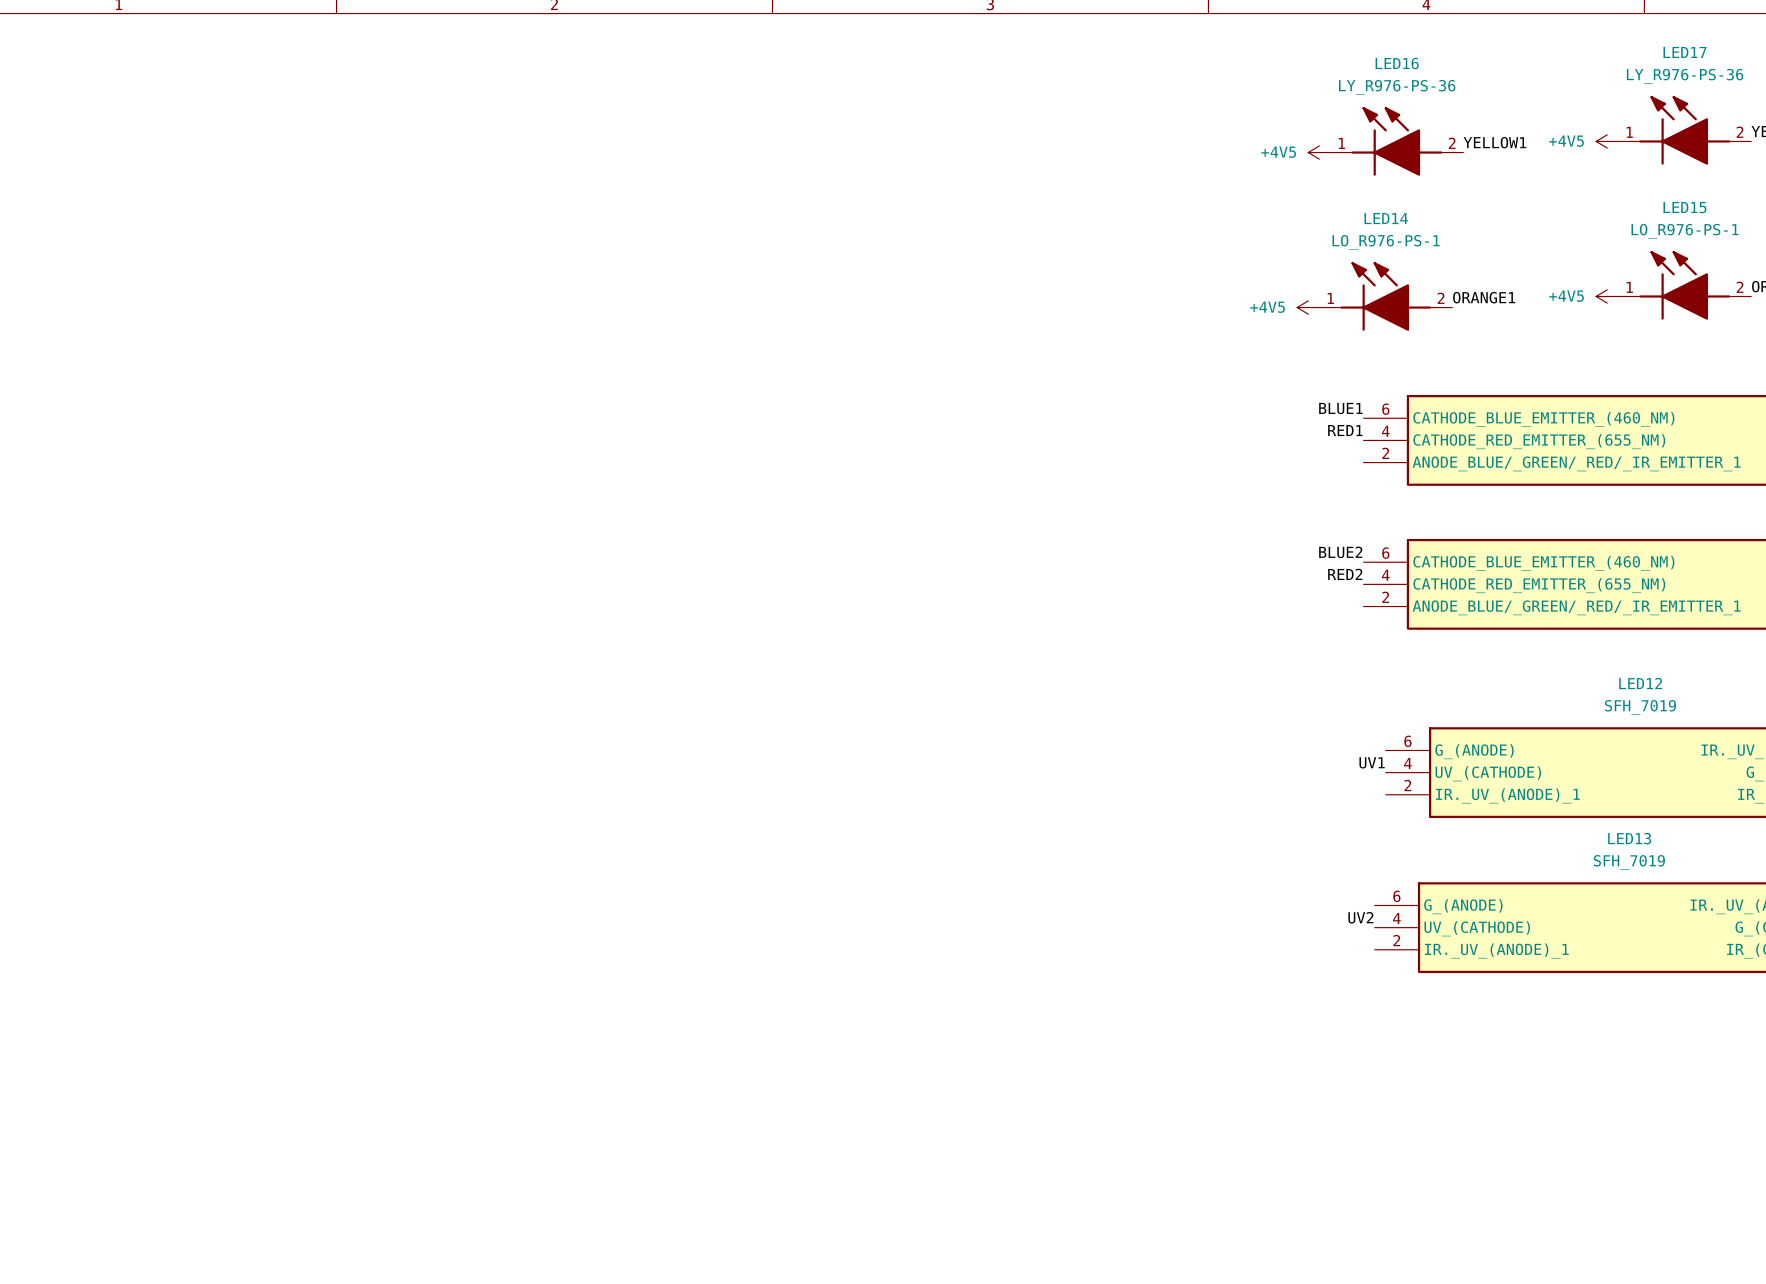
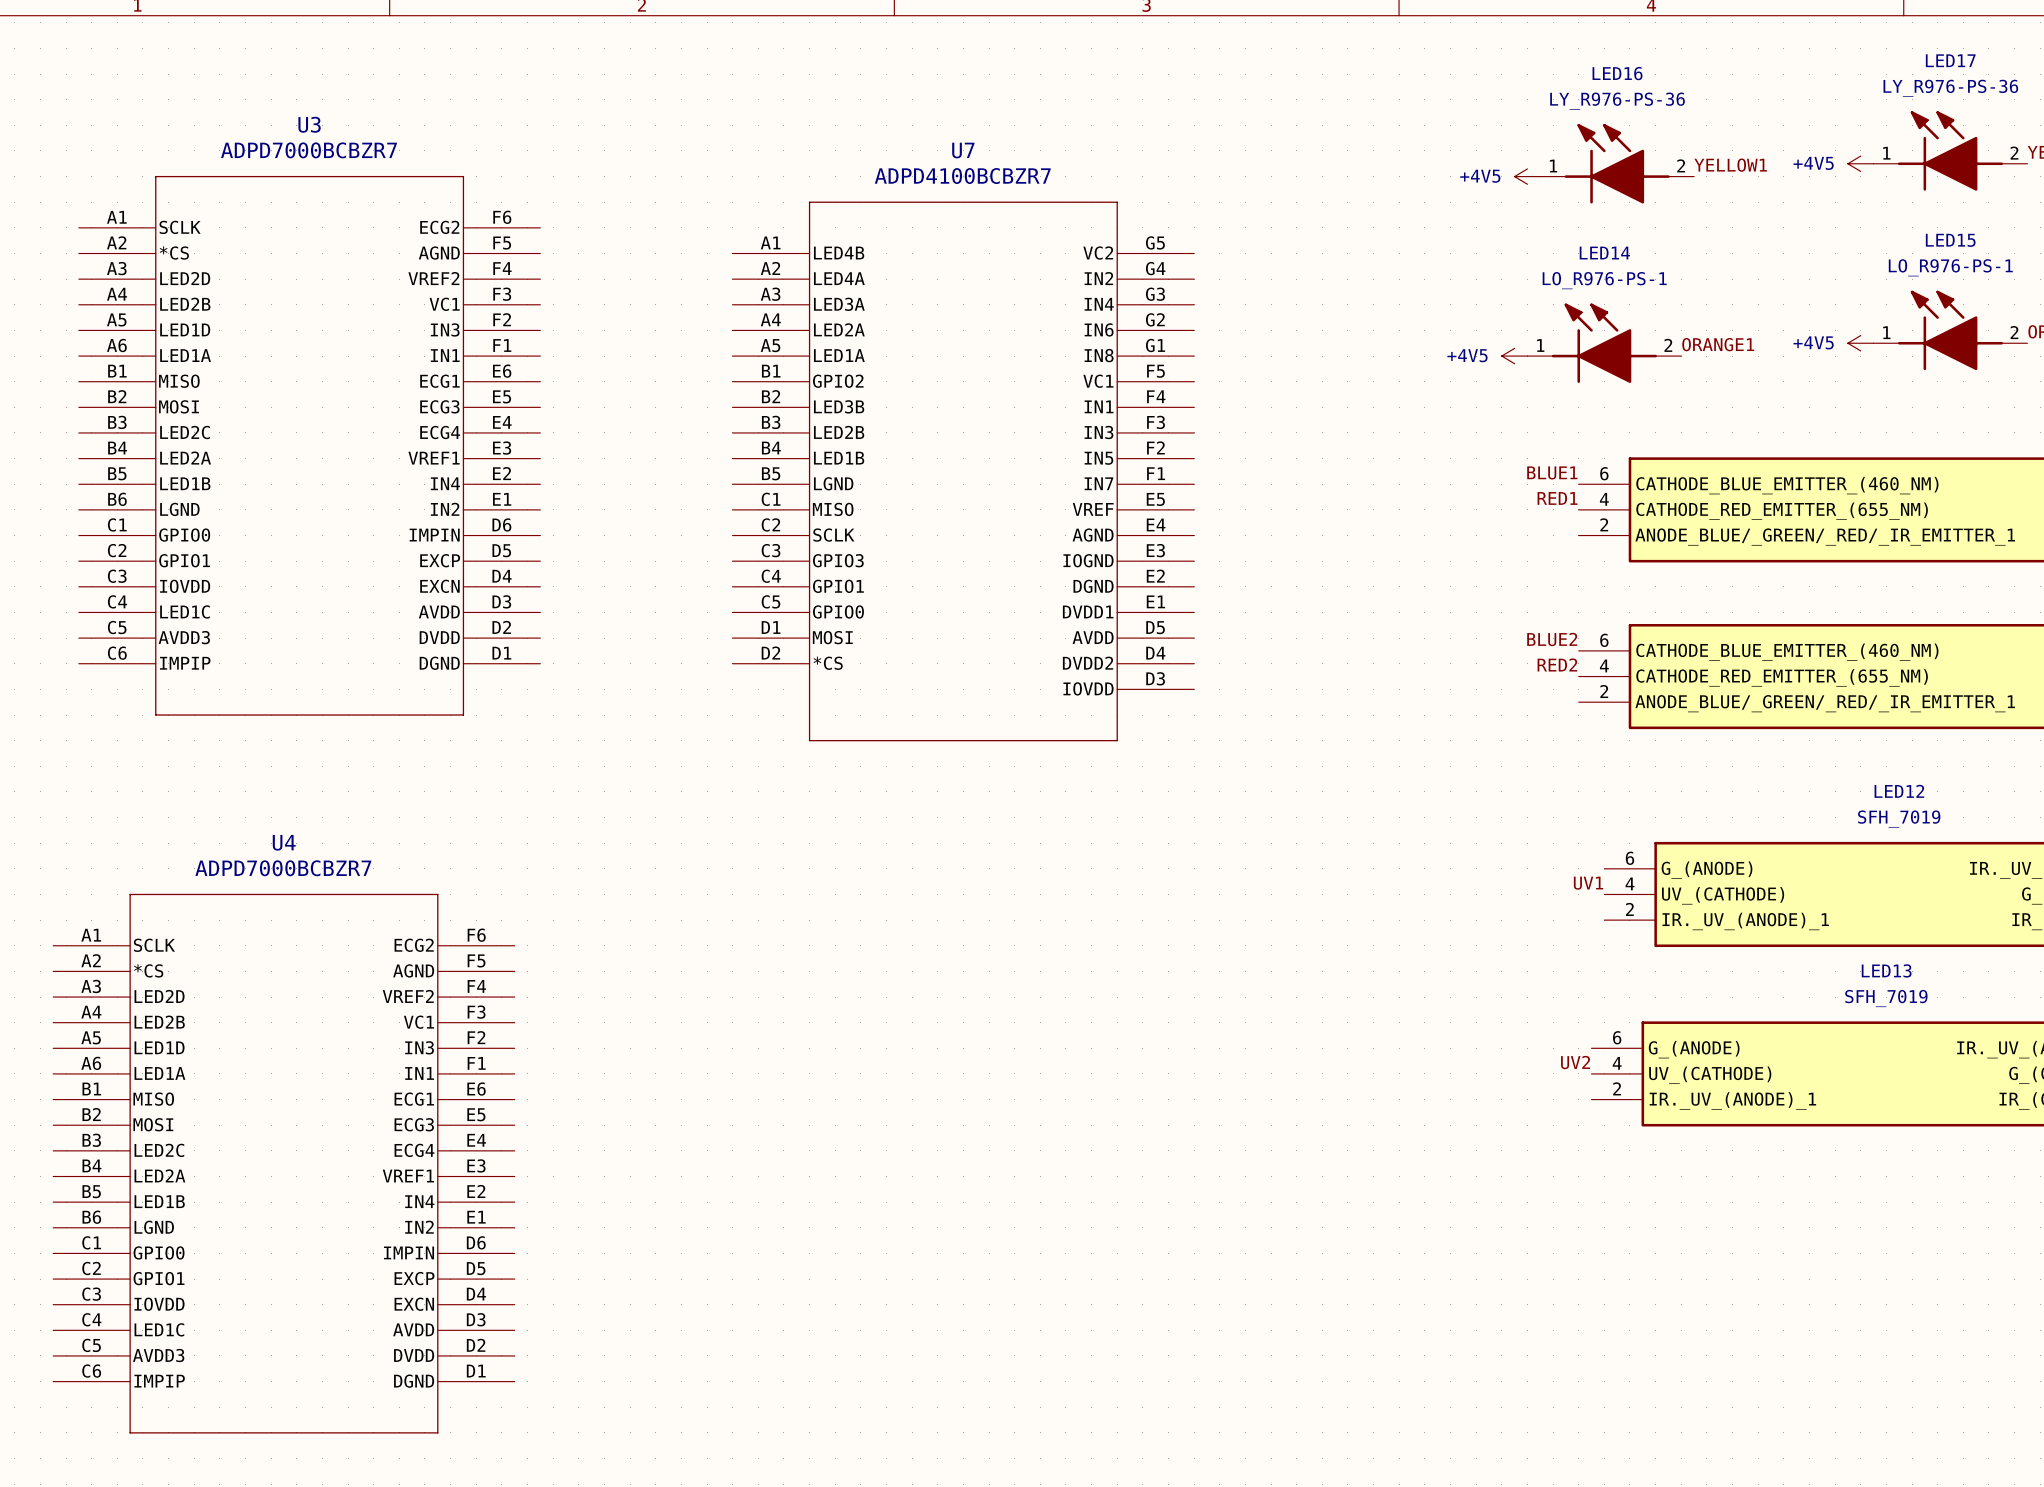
U3: none -> ADPD7000BCBZR7 (309, 445)
U7: none -> ADPD4100BCBZR7 (963, 471)
U4: none -> ADPD7000BCBZR7 (283, 1163)

